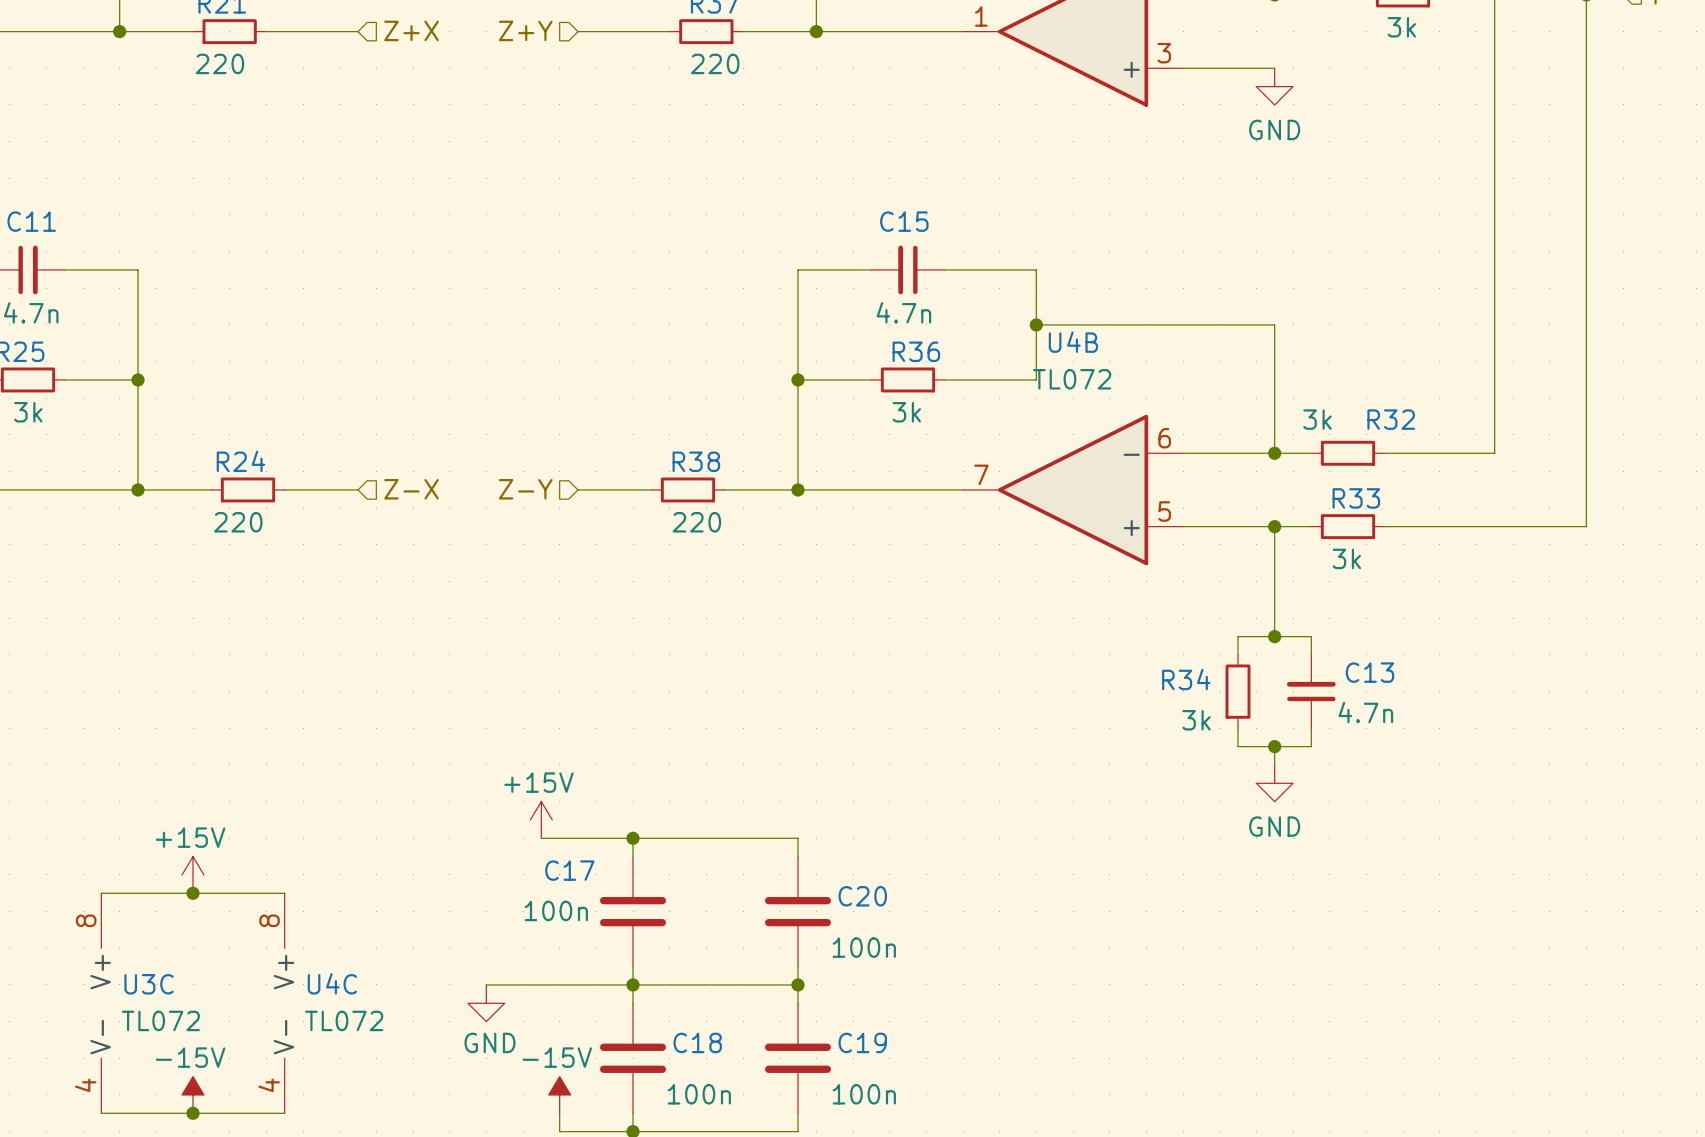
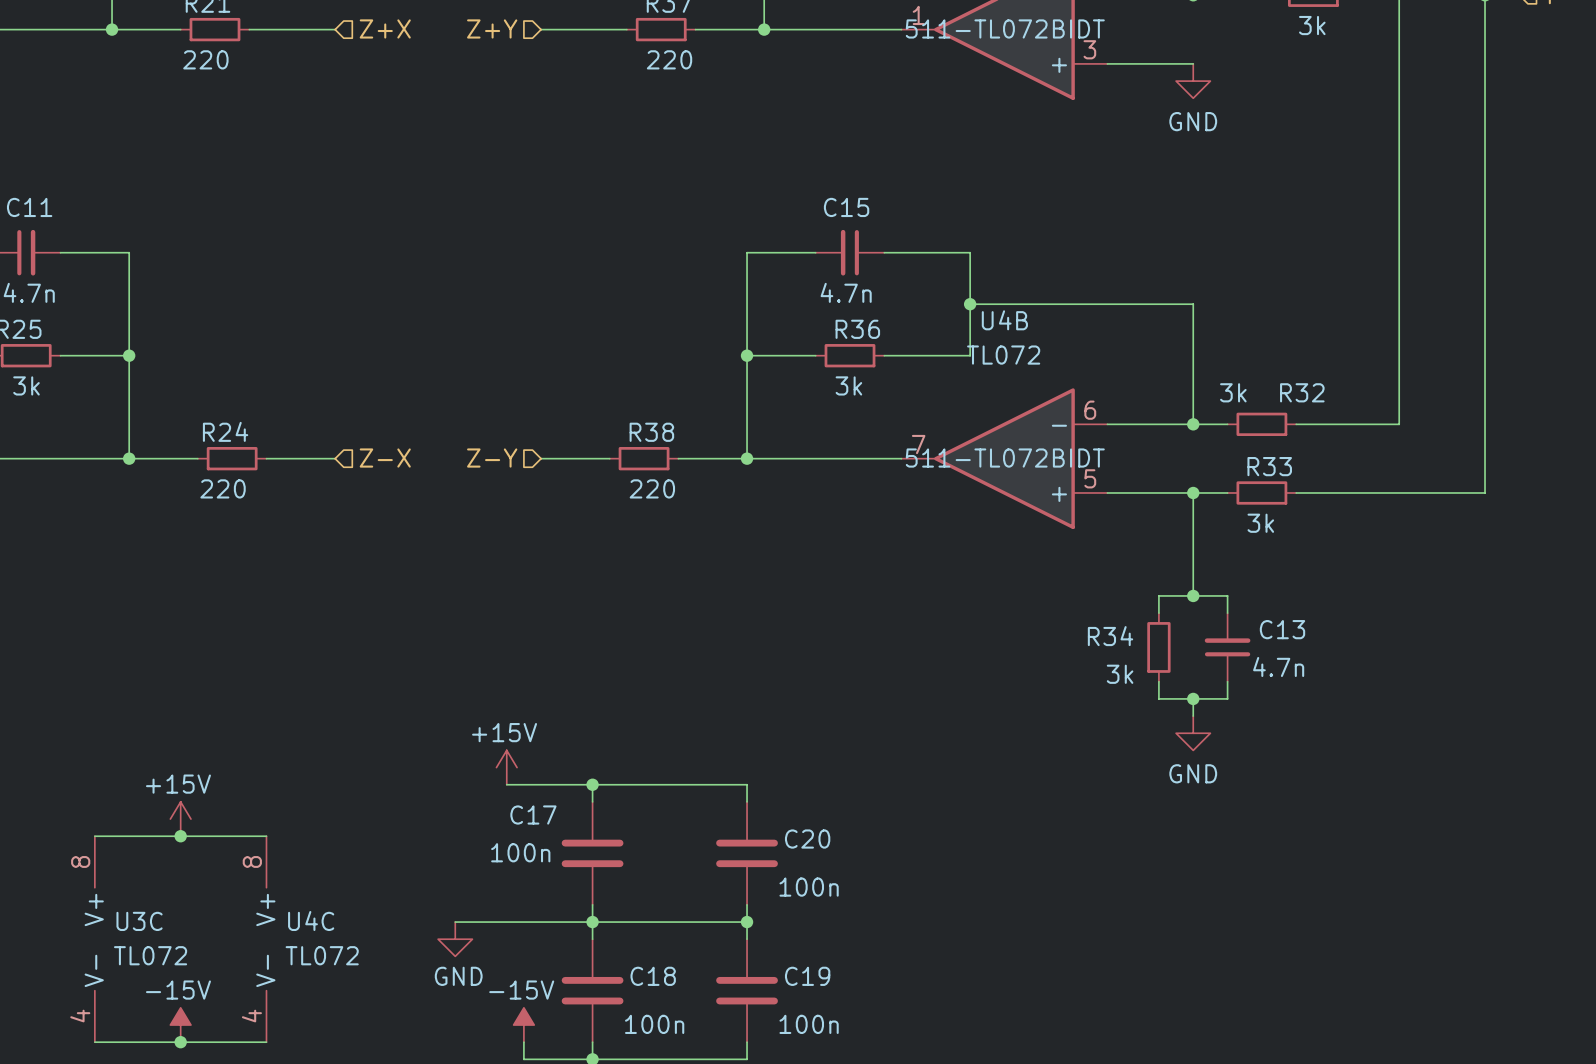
part text: none -> 511-TL072BIDT (1005, 28)
U4B text: none -> 511-TL072BIDT (1005, 458)

